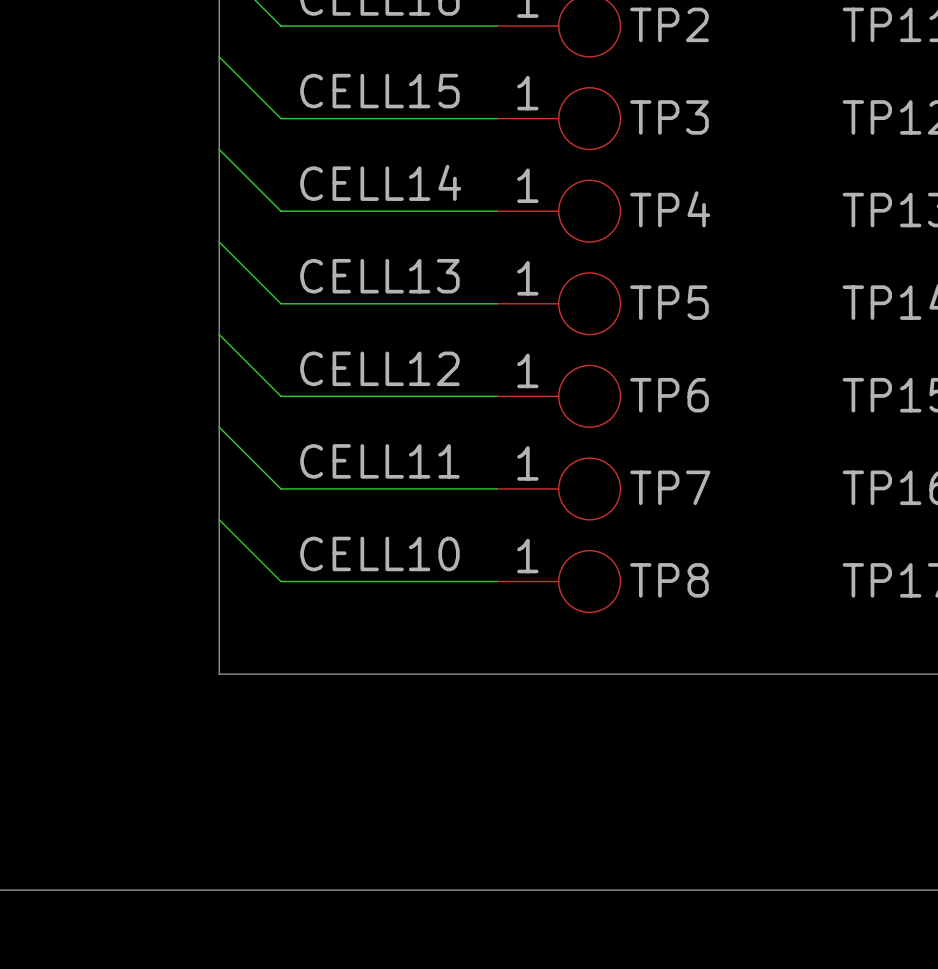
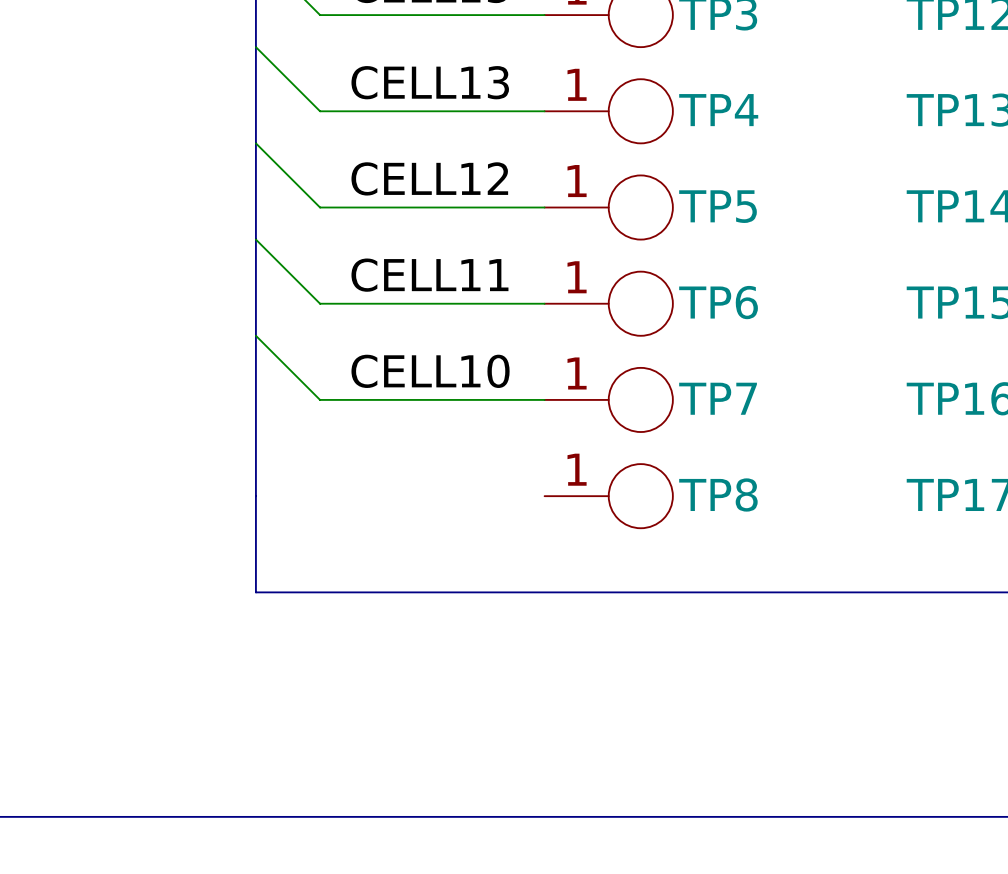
label: CELL14 (380, 182) -> CELL13 (430, 82)
label: CELL13 (379, 276) -> CELL12 (429, 178)
label: CELL12 (379, 368) -> CELL11 (429, 275)
label: CELL11 (379, 461) -> CELL10 (430, 371)
wire: (219, 519) (280, 581) (497, 581) -> none
label: CELL10 (379, 553) -> none

